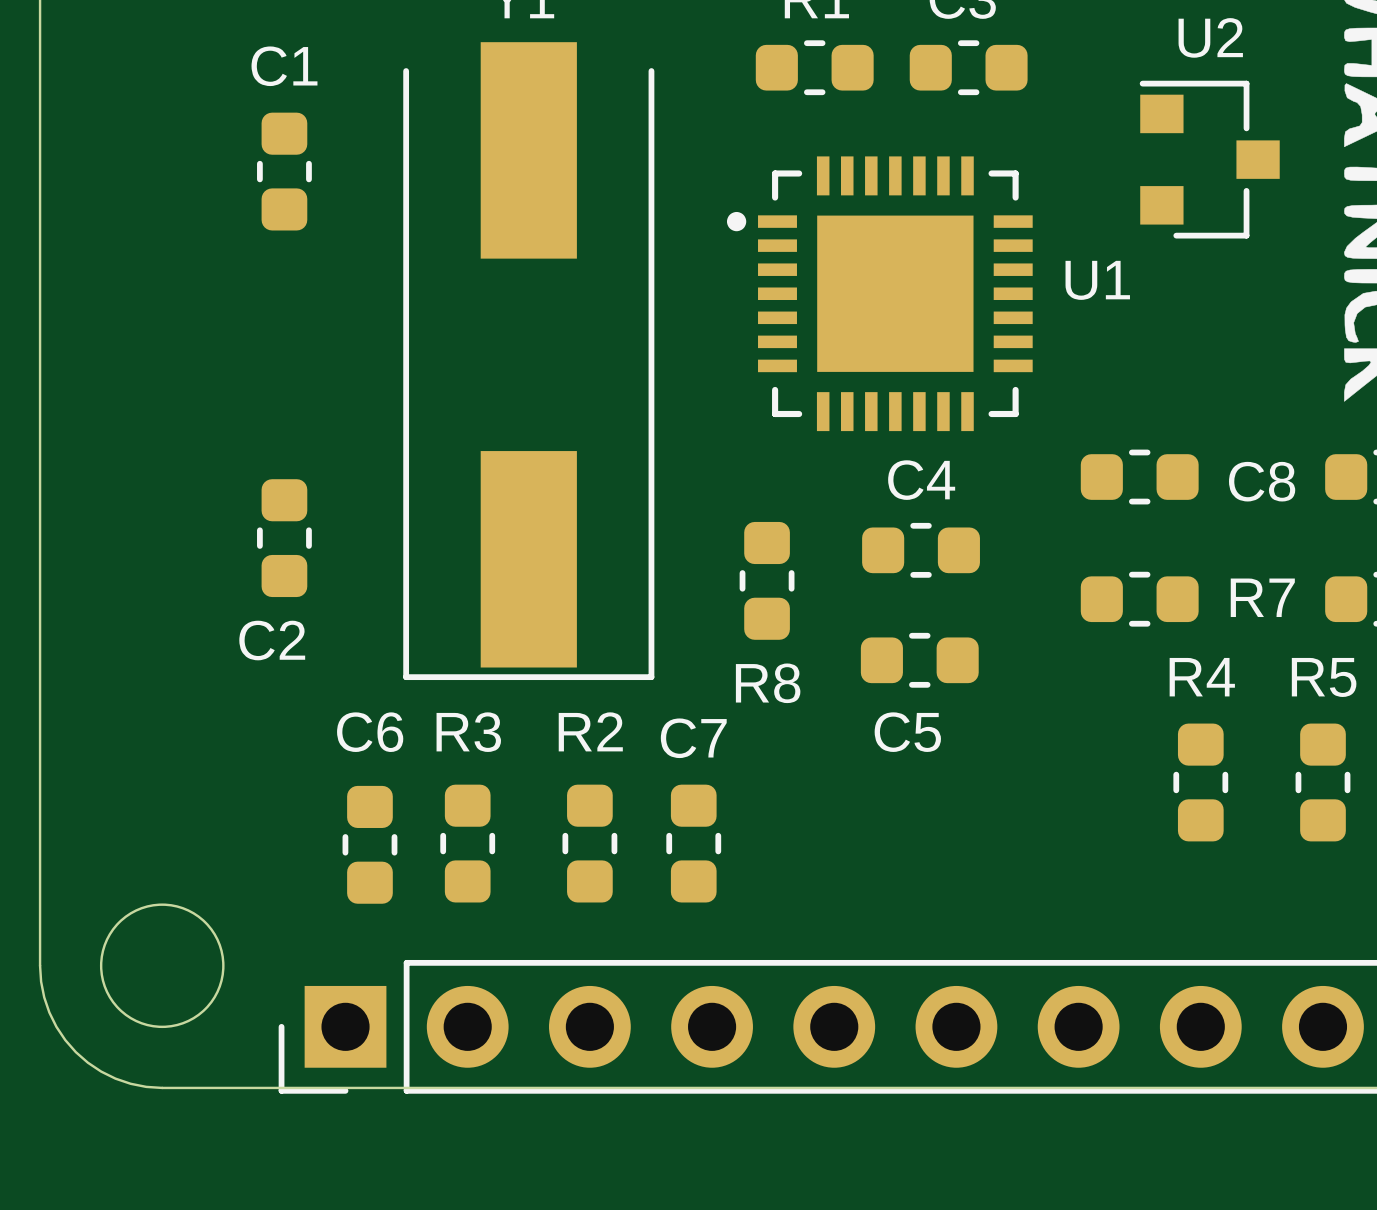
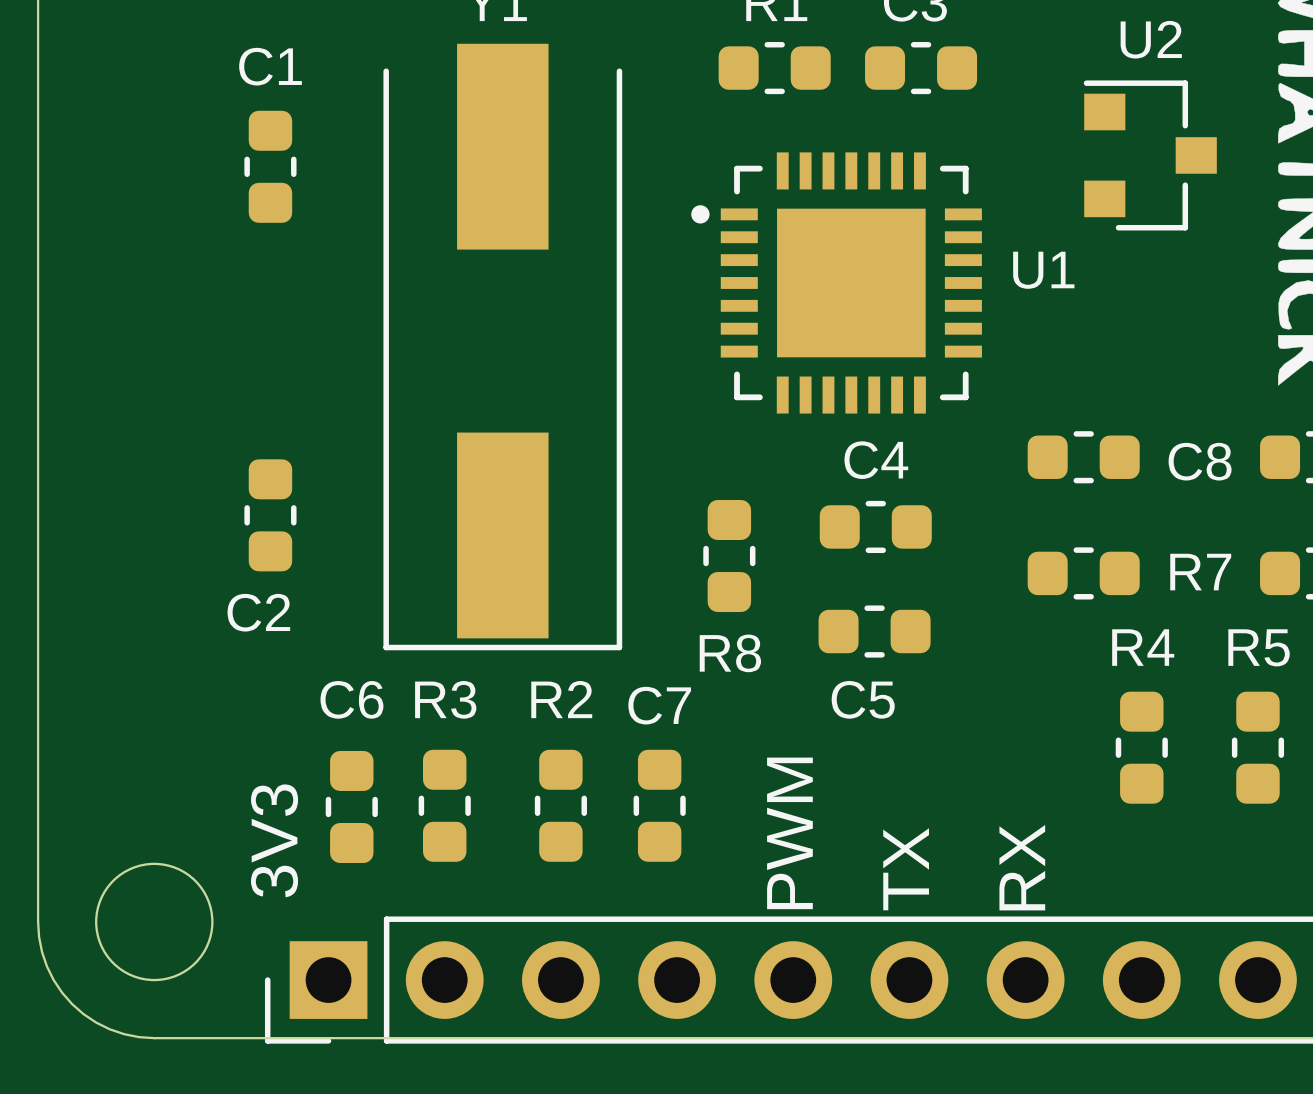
text: none -> PWM (789, 833)
text: none -> 3V3 (274, 840)
text: none -> RX (1022, 867)
text: none -> TX (906, 869)

